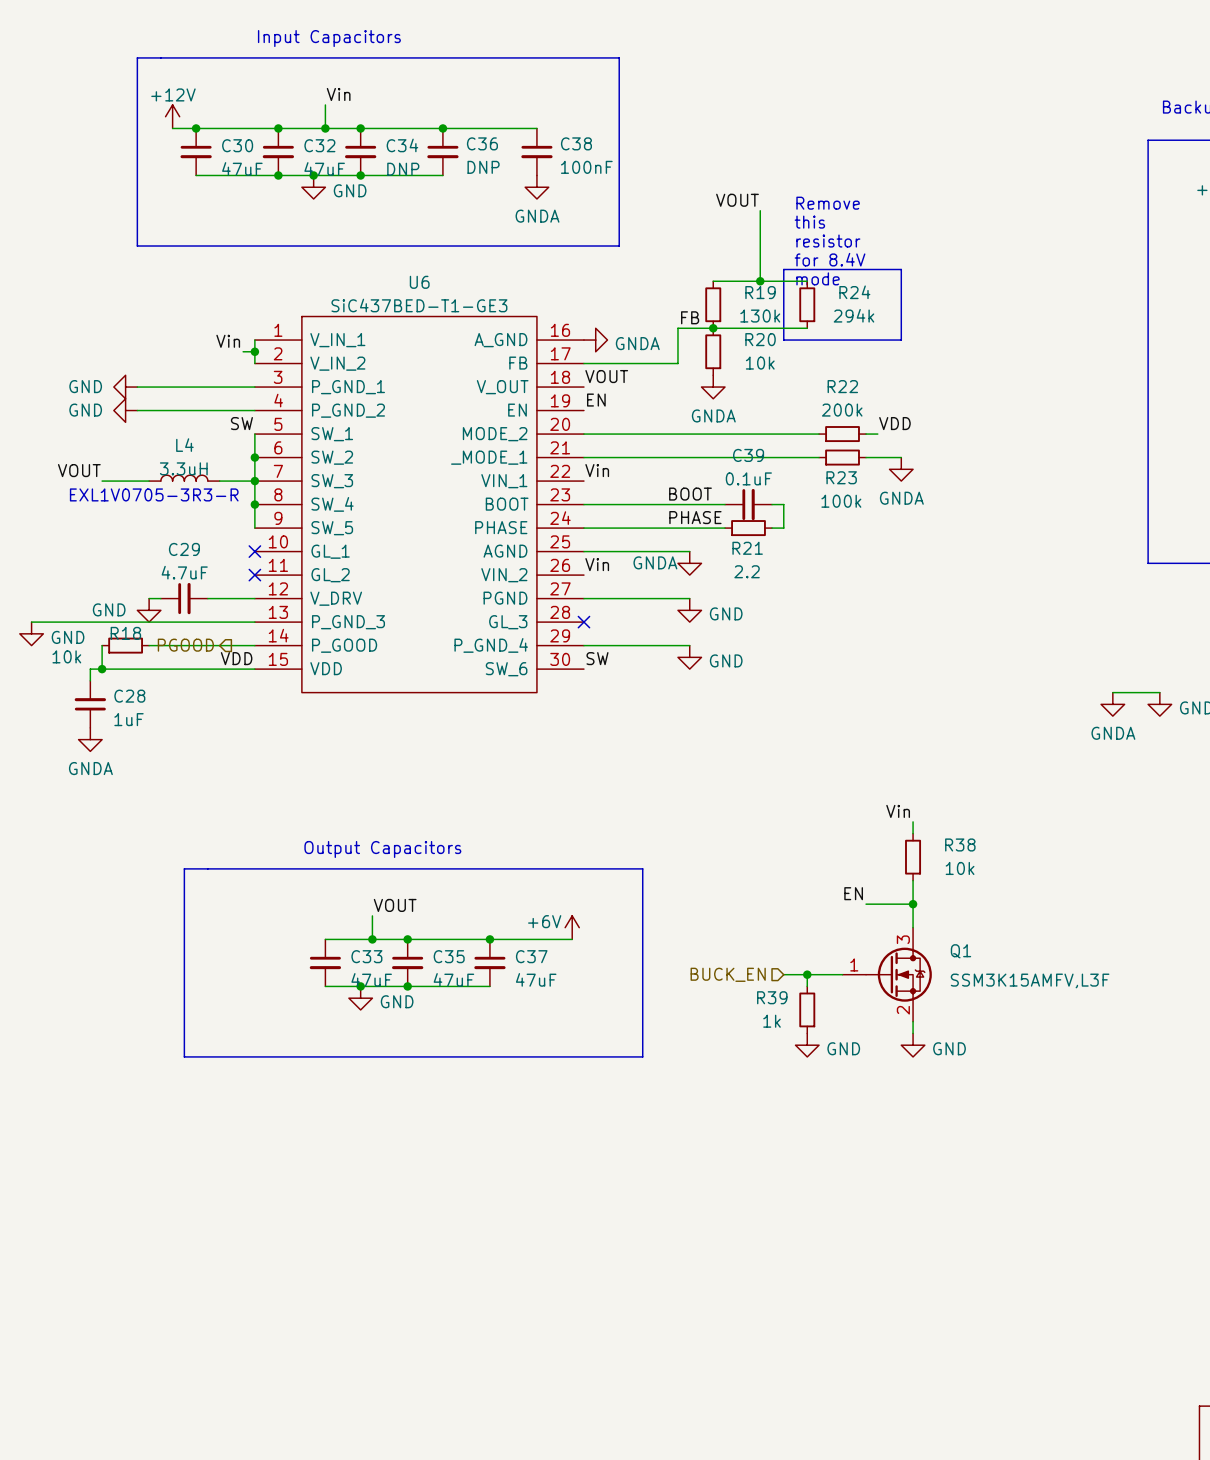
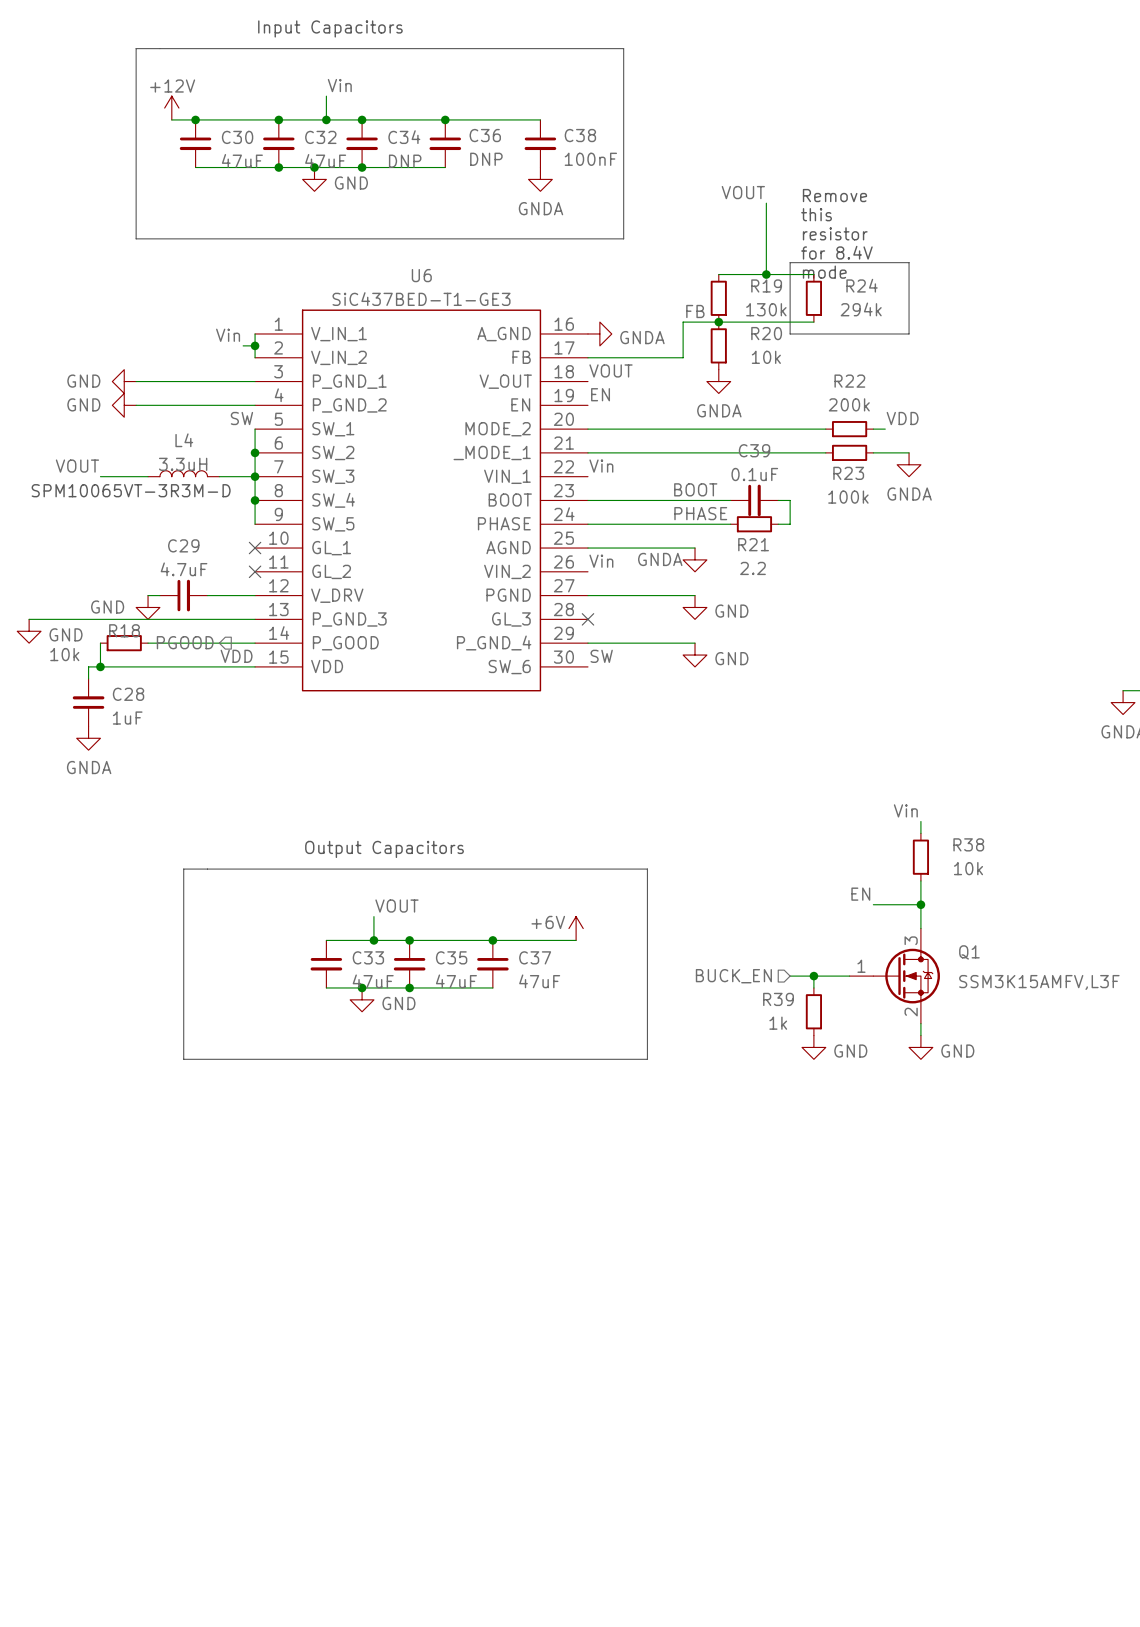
text: none -> SPM10065VT-3R3M-D (131, 490)
text: EXL1V0705-3R3-R (154, 494) -> none

